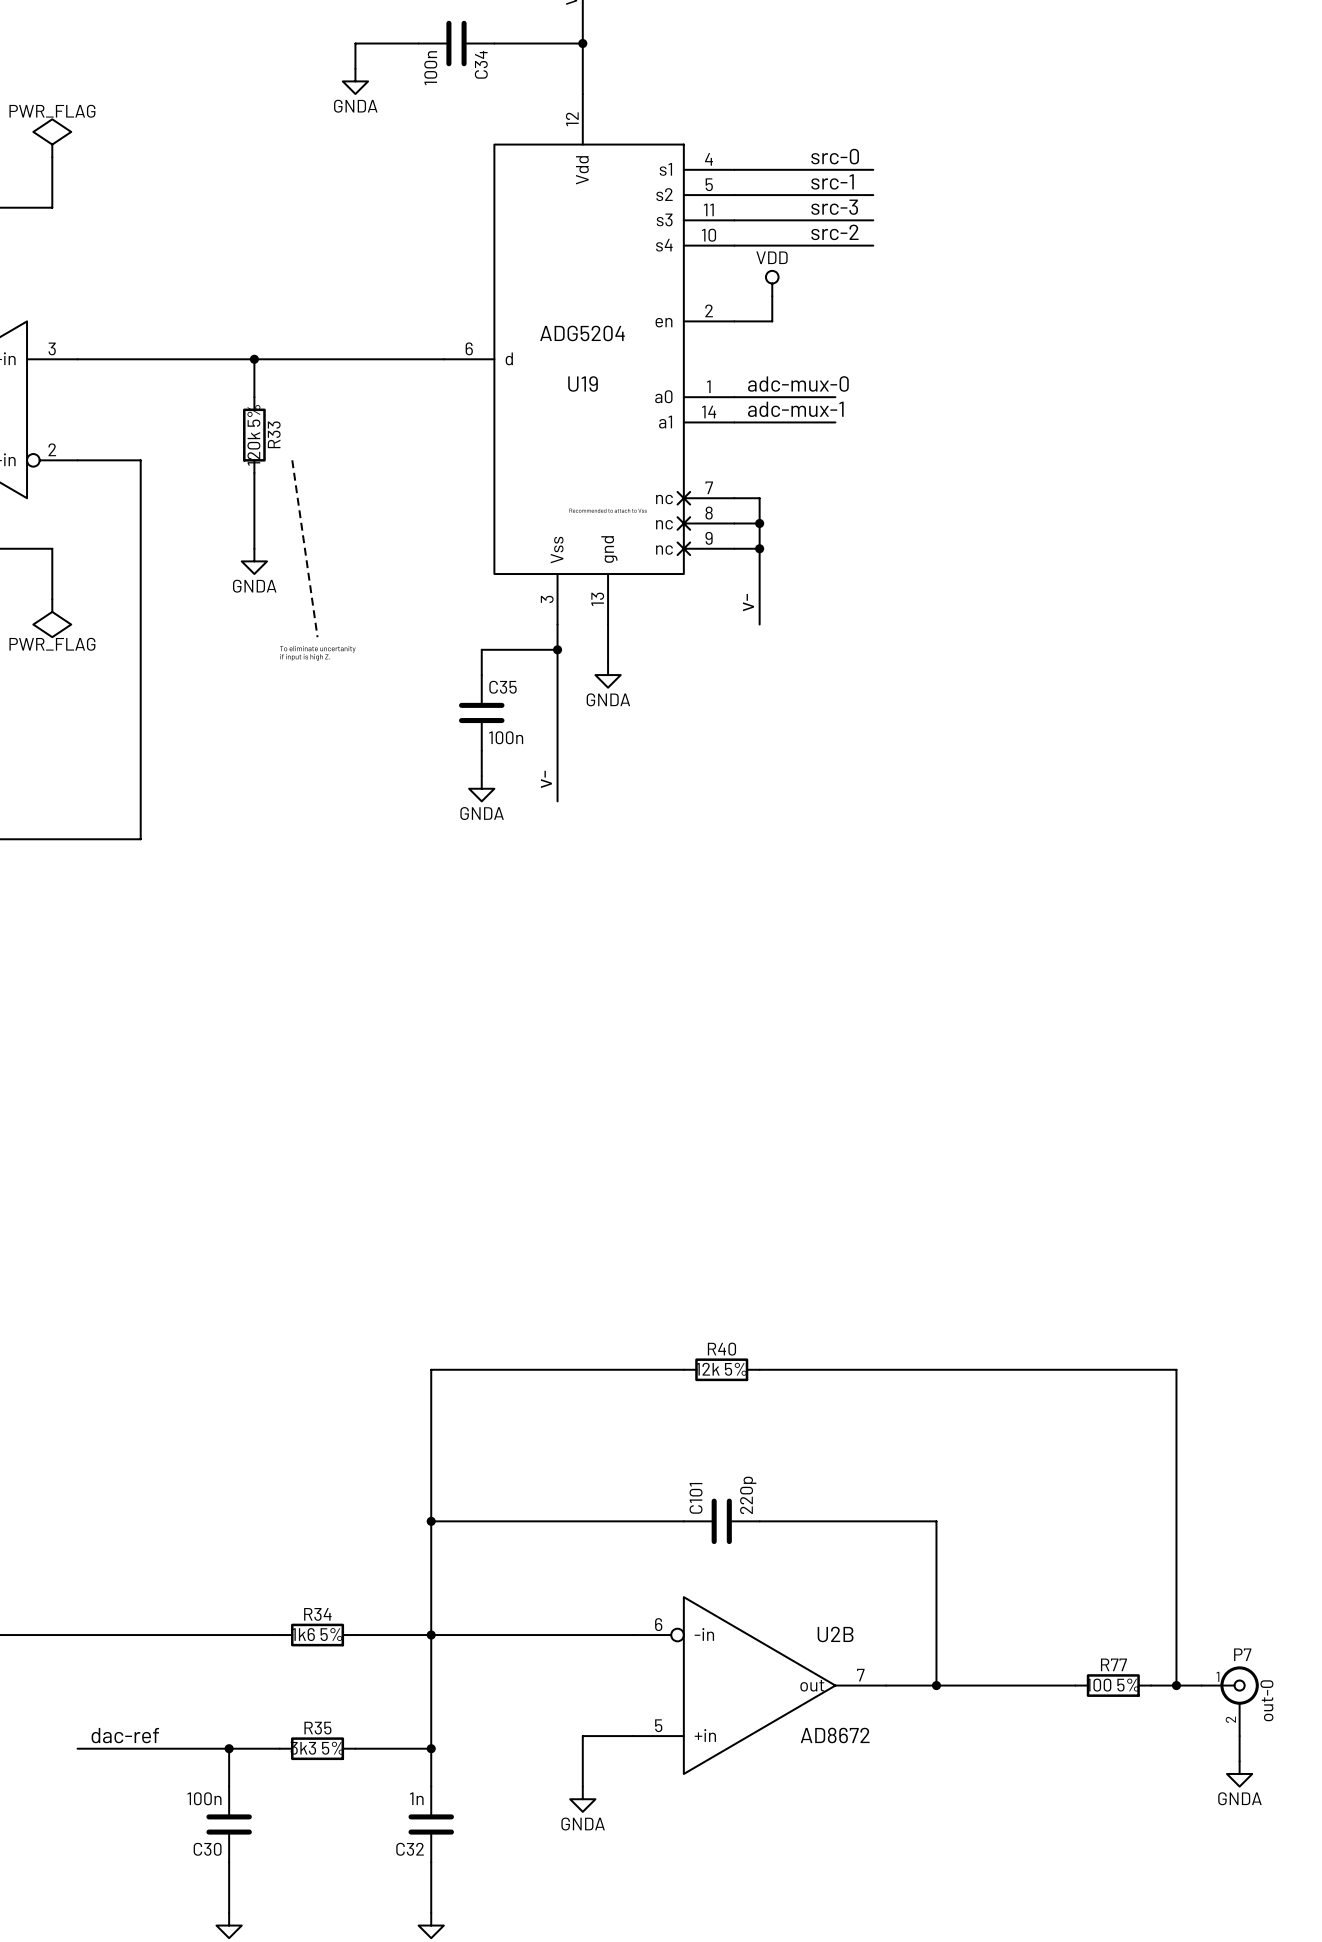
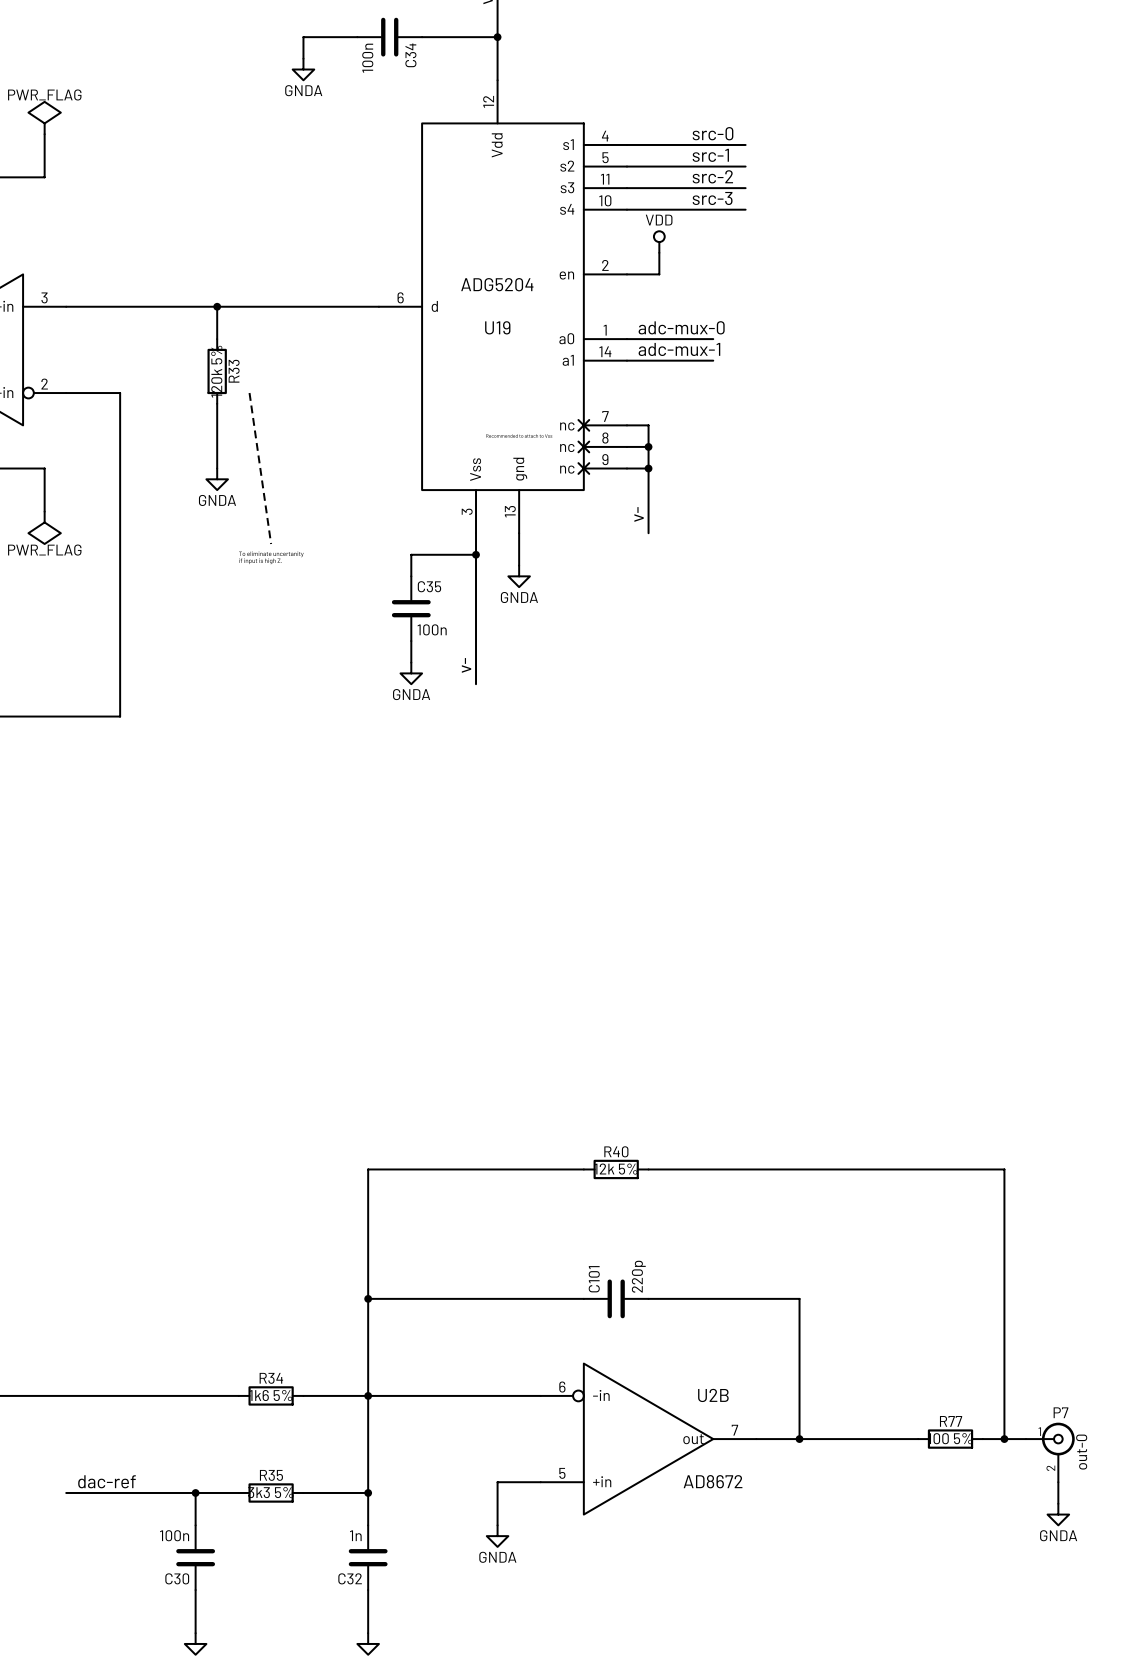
label: src-3 (834, 207) -> src-2 (712, 176)
label: src-2 (834, 232) -> src-3 (712, 198)

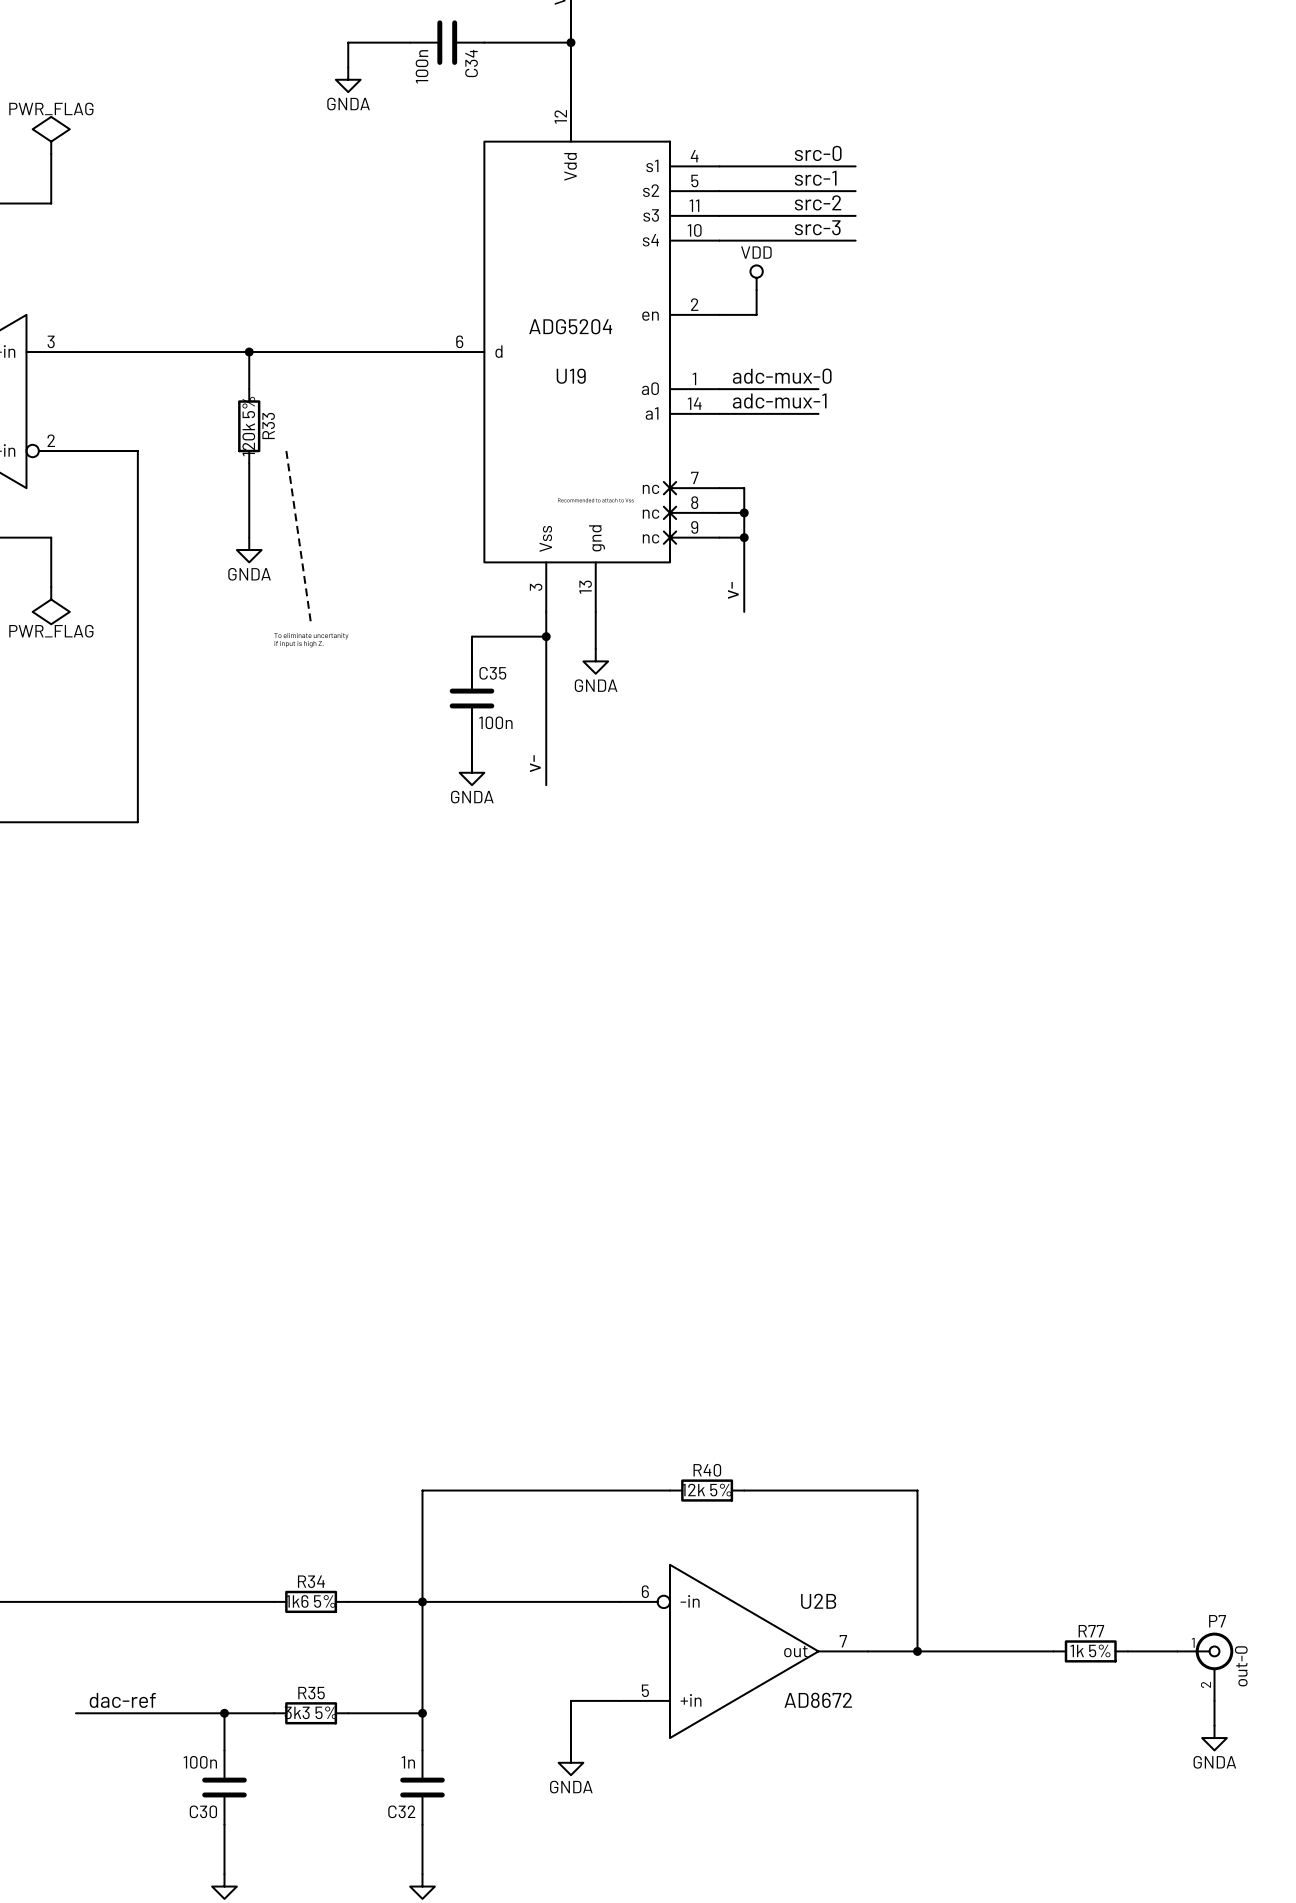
wire: (583, 1169) (368, 1169) (368, 1298) -> none
R40 position: (616, 1169) -> (707, 1490)
wire: (648, 1169) (1004, 1169) (1004, 1439) -> none
junction: (368, 1298) -> none
C101: 220p (616, 1298) -> none
R77 value: 100 5% (950, 1438) -> 1k 5% (1090, 1650)
junction: (1004, 1439) -> none

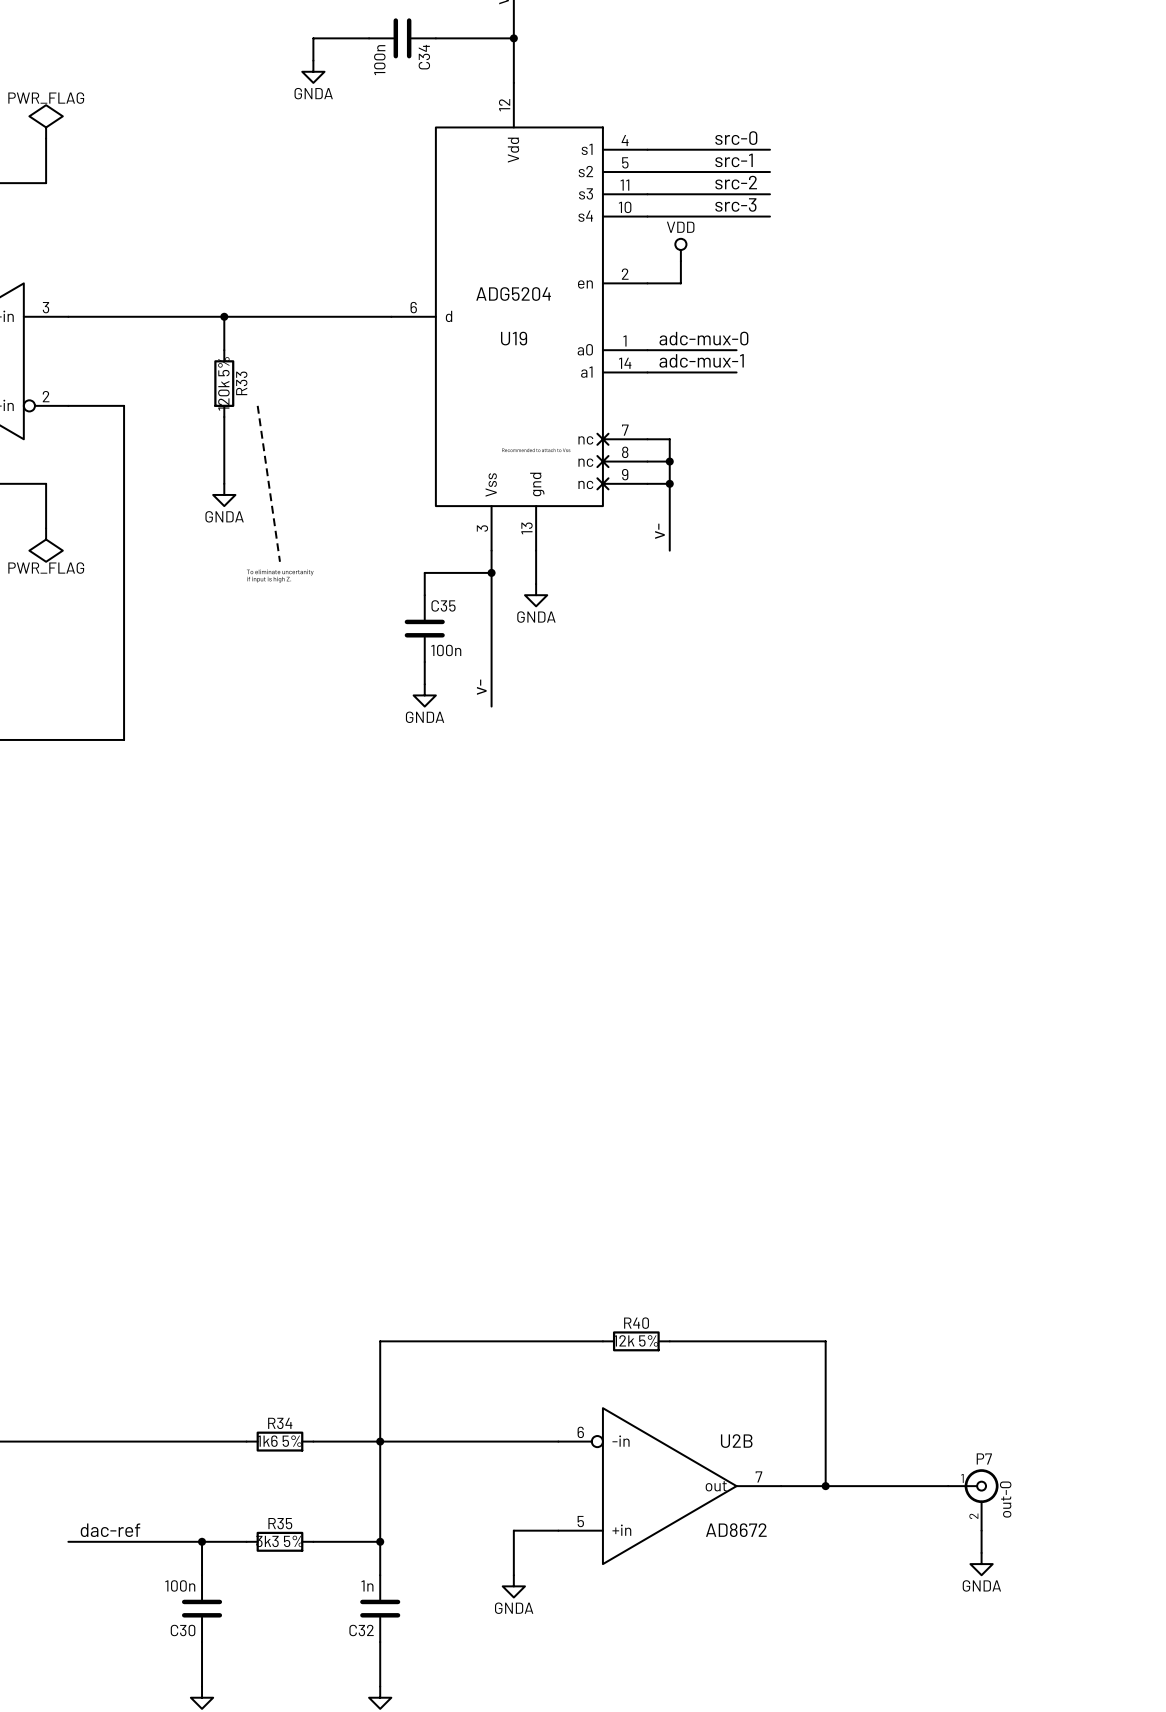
R77: 1k 5% (1090, 1651) -> none
wire: (1127, 1651) (1177, 1651) -> none
P7 position: (1205, 1666) -> (973, 1499)
wire: (1214, 1700) (1214, 1725) -> (981, 1530) (981, 1552)
power symbol position: GNDA (1214, 1738) -> GNDA (981, 1564)

